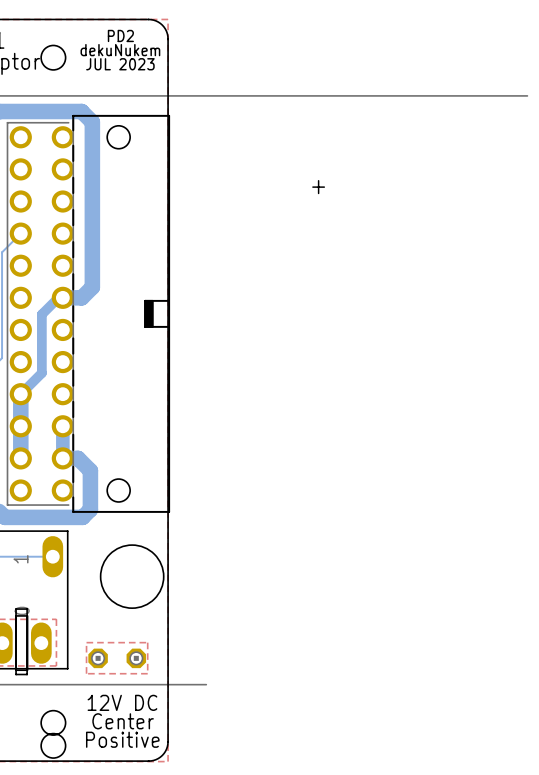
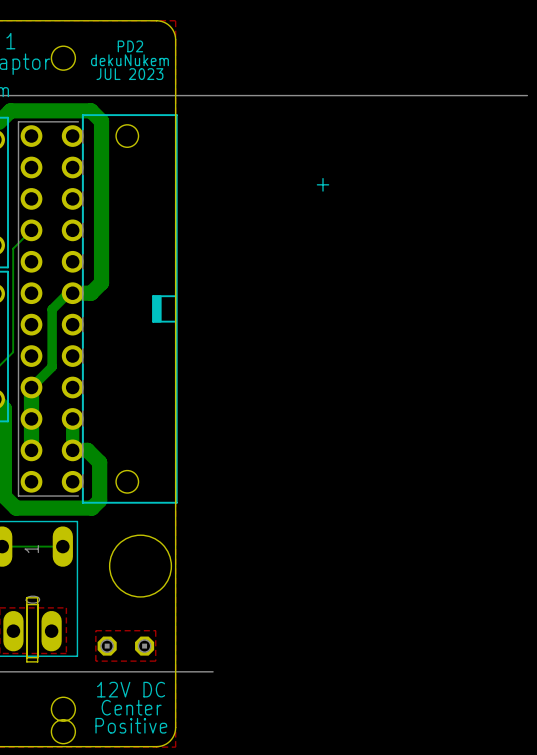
text: PD2 (120, 35) -> none
text: dekuNukem (120, 50) -> PD2 (130, 46)
text: JUL 2023 (120, 64) -> dekuNukem (129, 60)
text: none -> JUL 2023 (129, 74)

